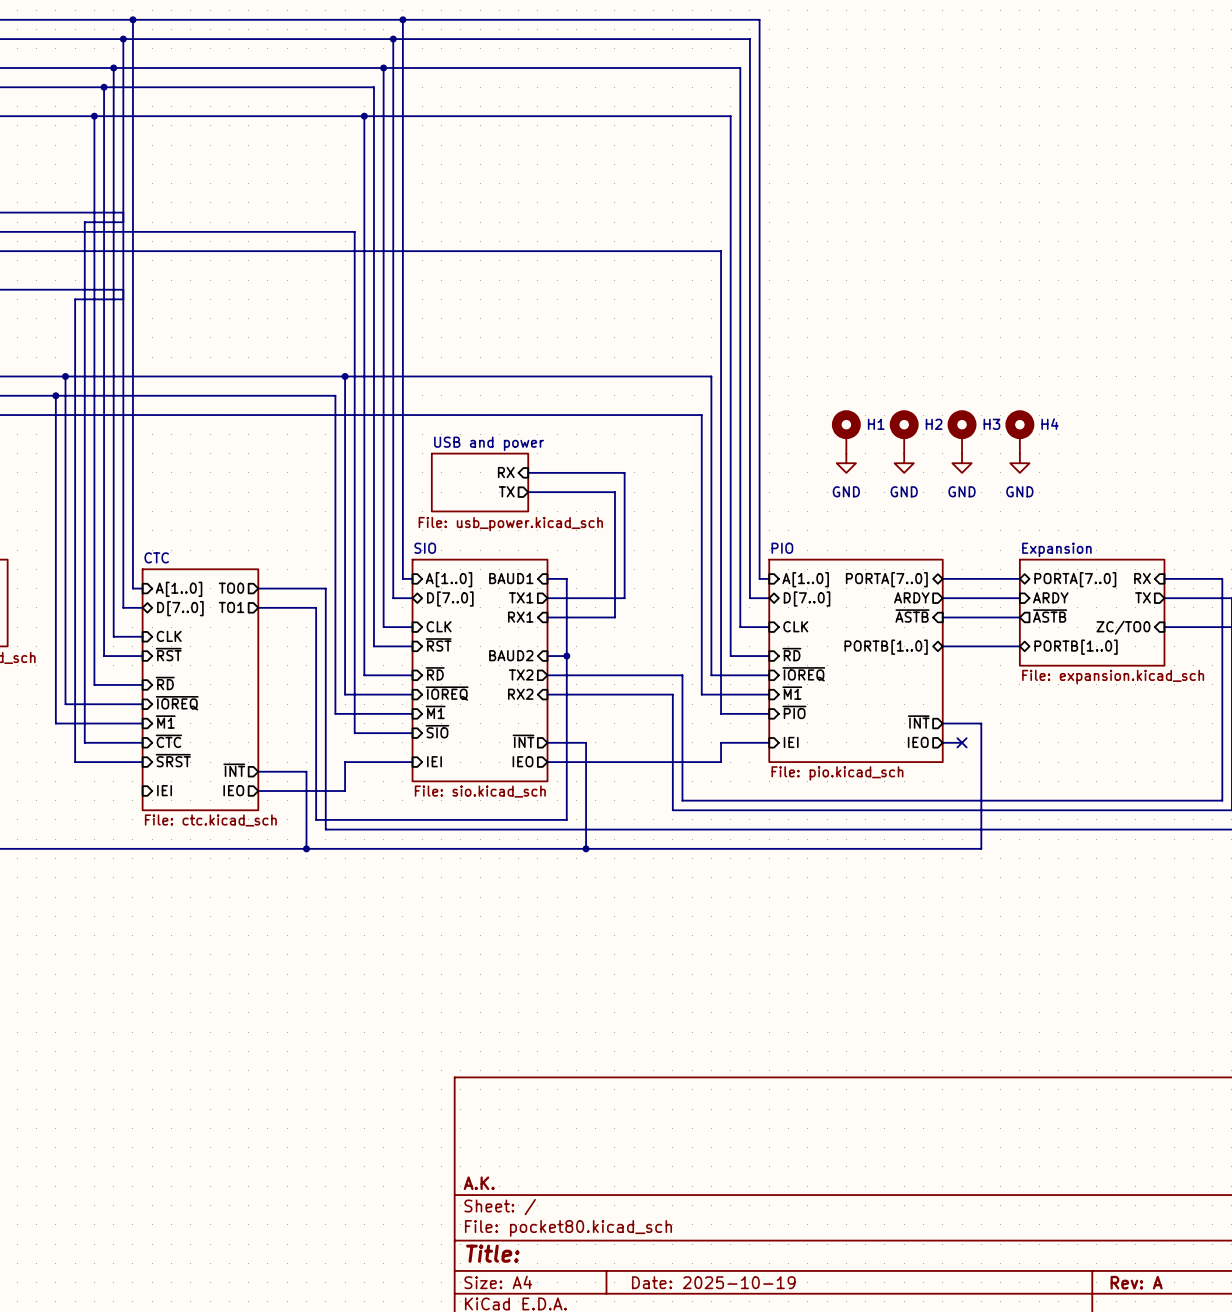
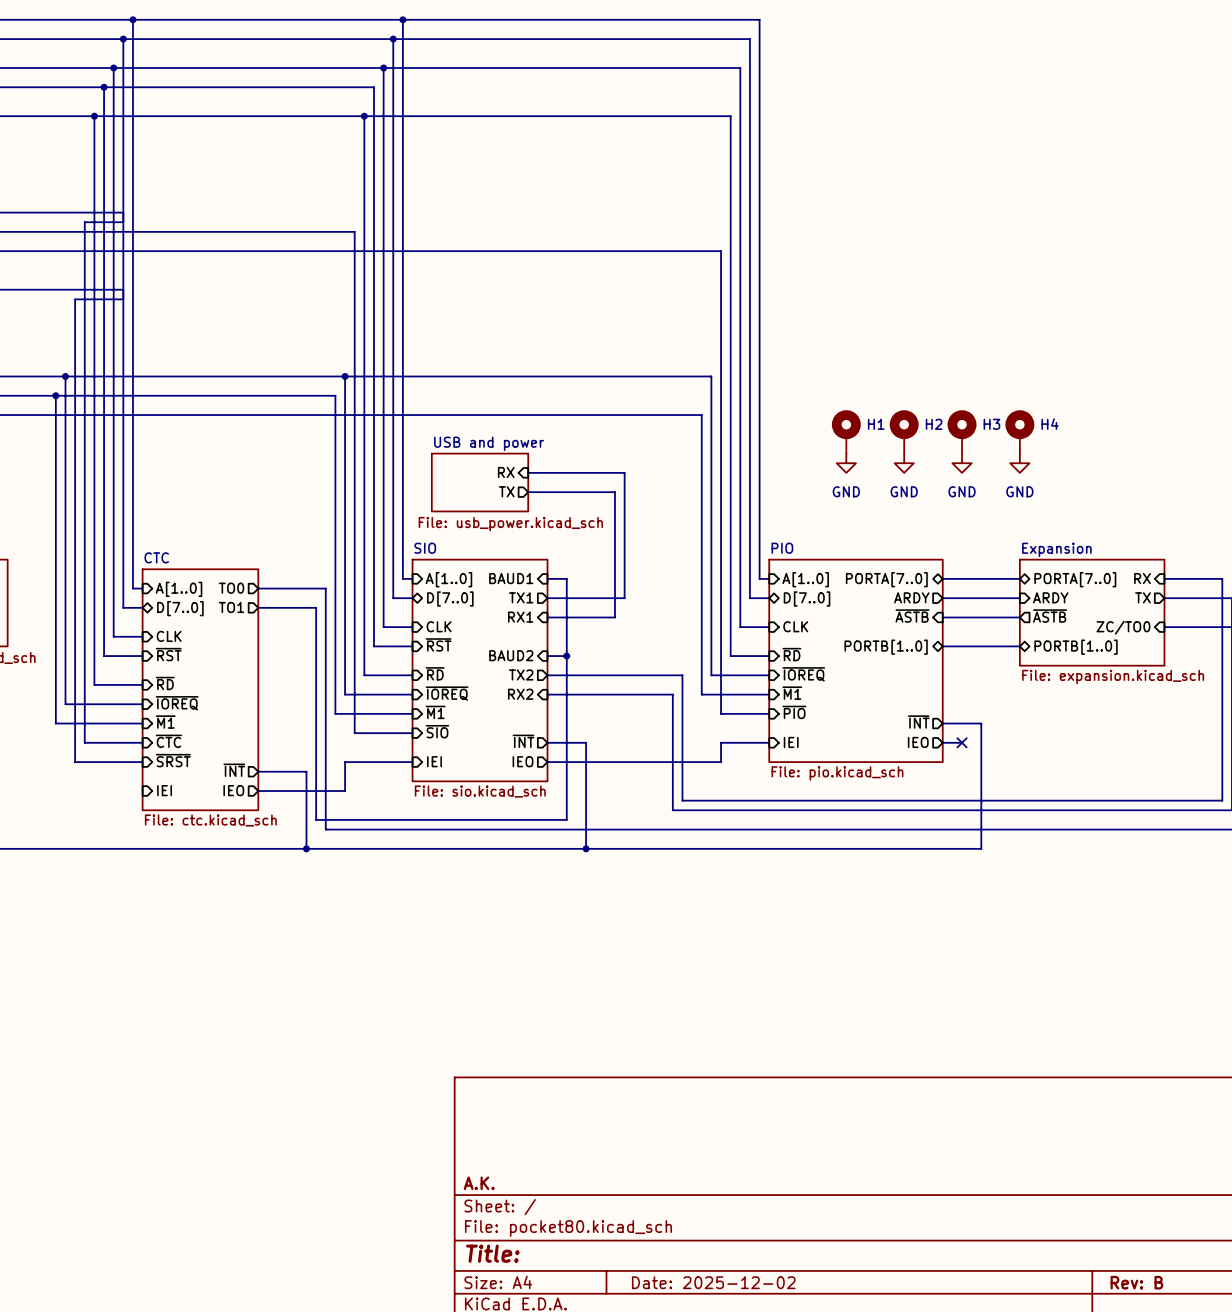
title block: Date: 2025-10-19 (713, 1282) -> Date: 2025-12-02 (713, 1282)
title block: Rev: A (1136, 1282) -> Rev: B (1136, 1282)

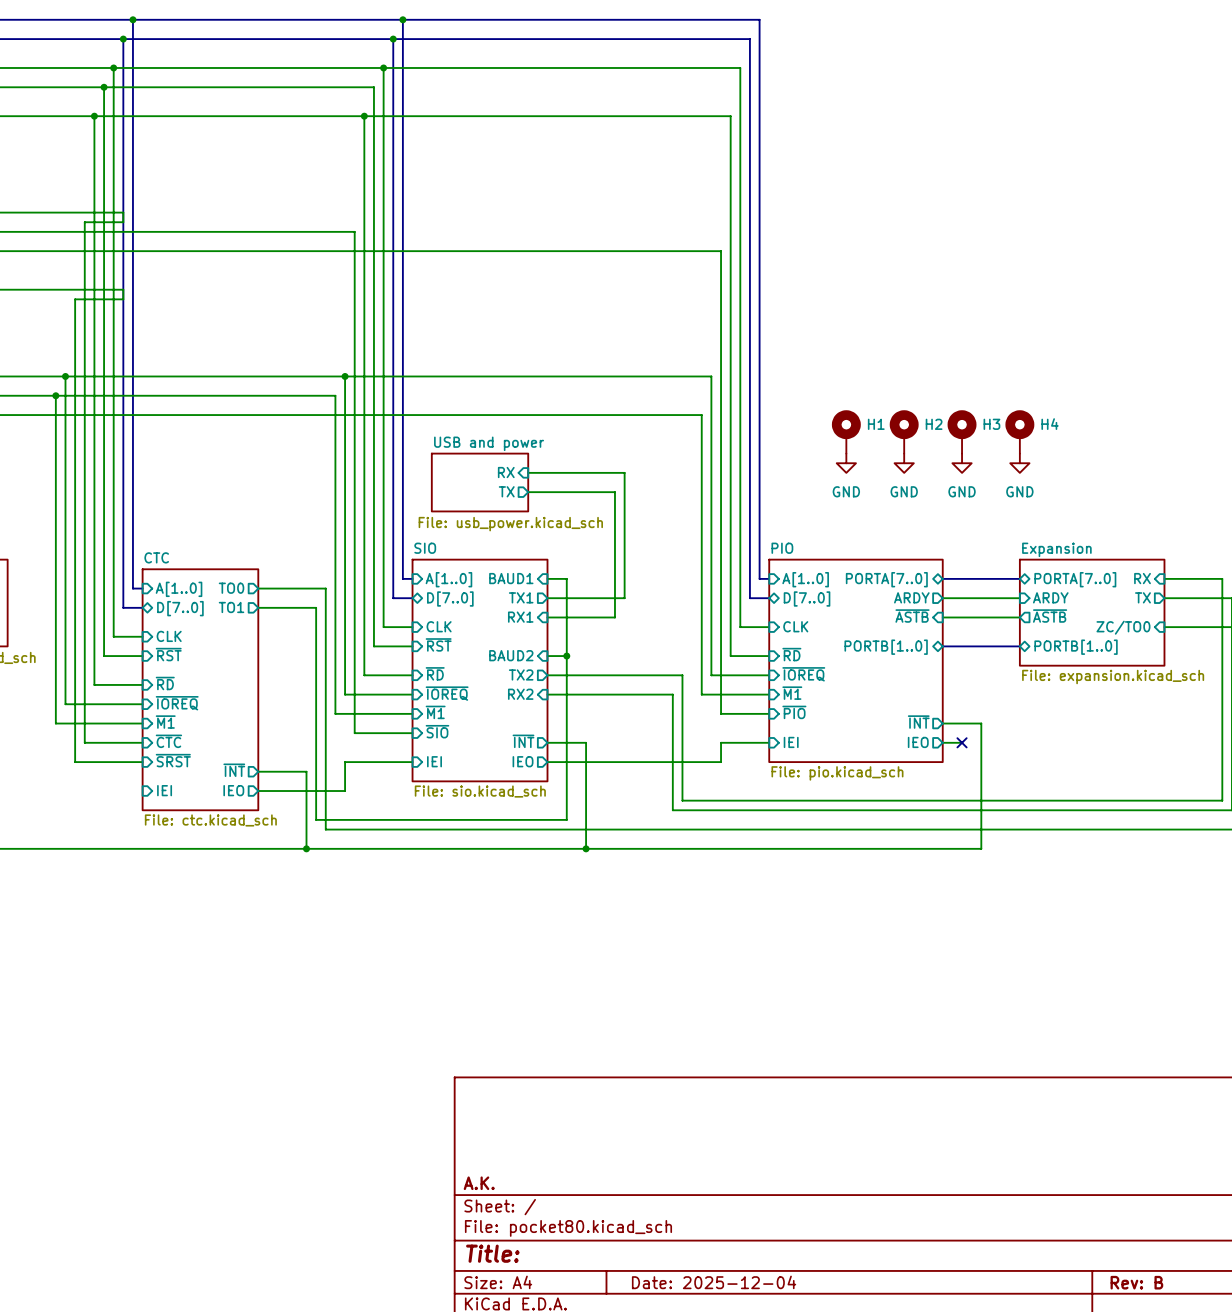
title block: Date: 2025-12-02 (713, 1282) -> Date: 2025-12-04 (714, 1282)

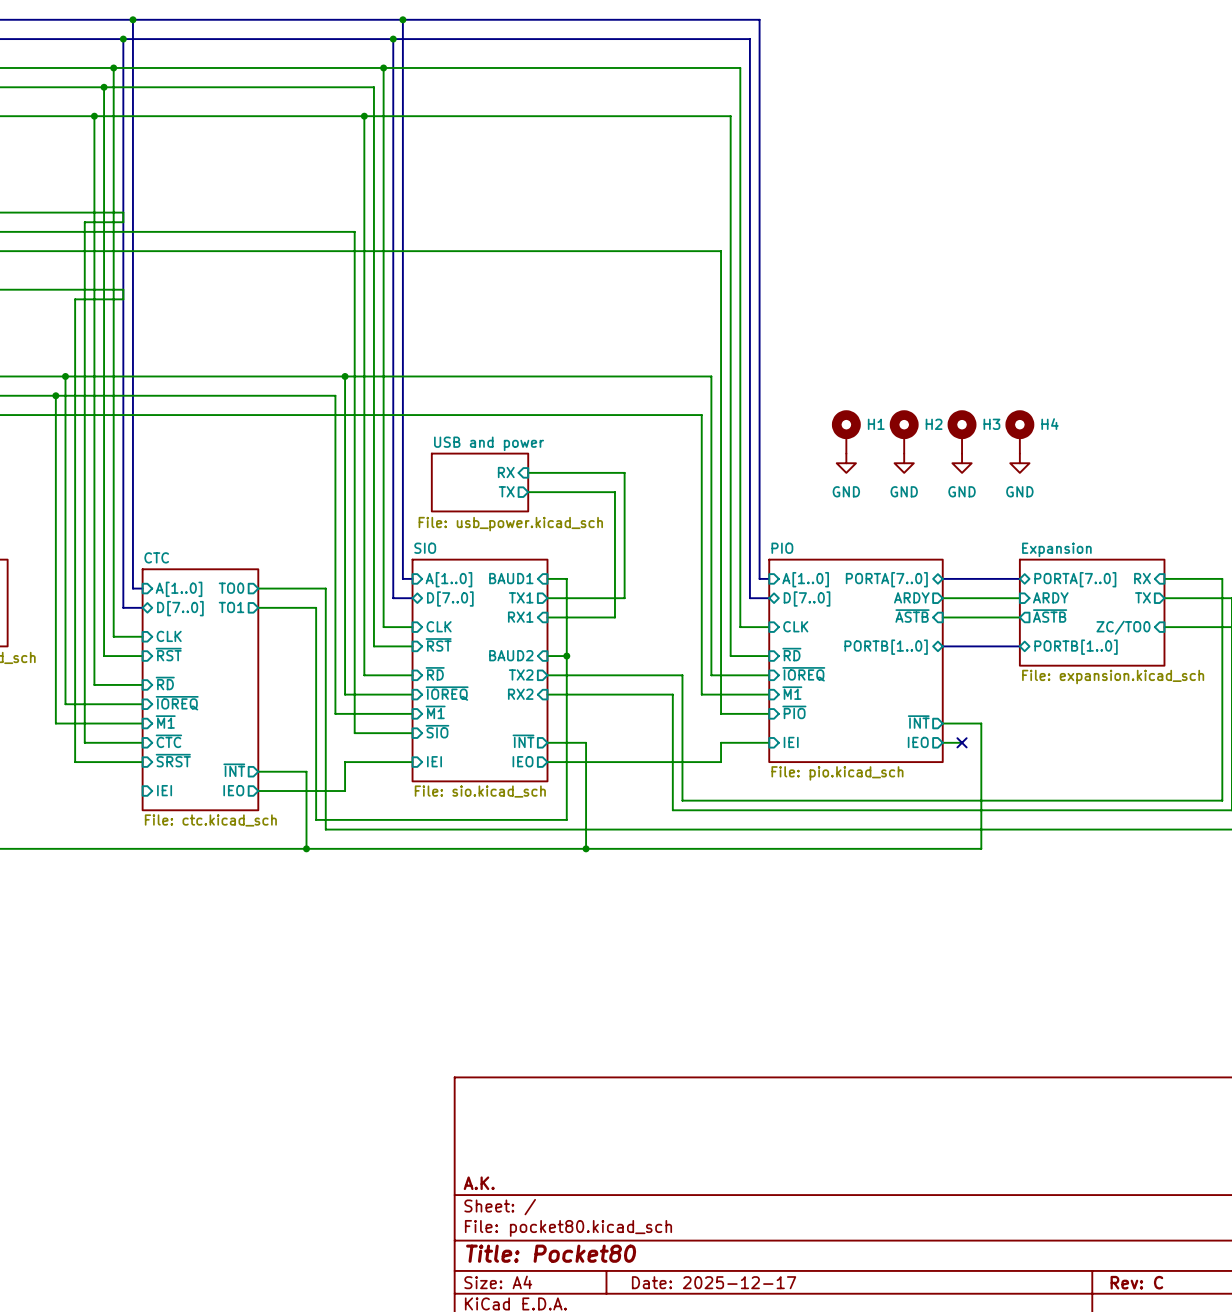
title block: Title: (492, 1253) -> Title: Pocket80 (551, 1253)
title block: Date: 2025-12-04 (714, 1282) -> Date: 2025-12-17 (714, 1282)
title block: Rev: B (1136, 1282) -> Rev: C (1136, 1282)

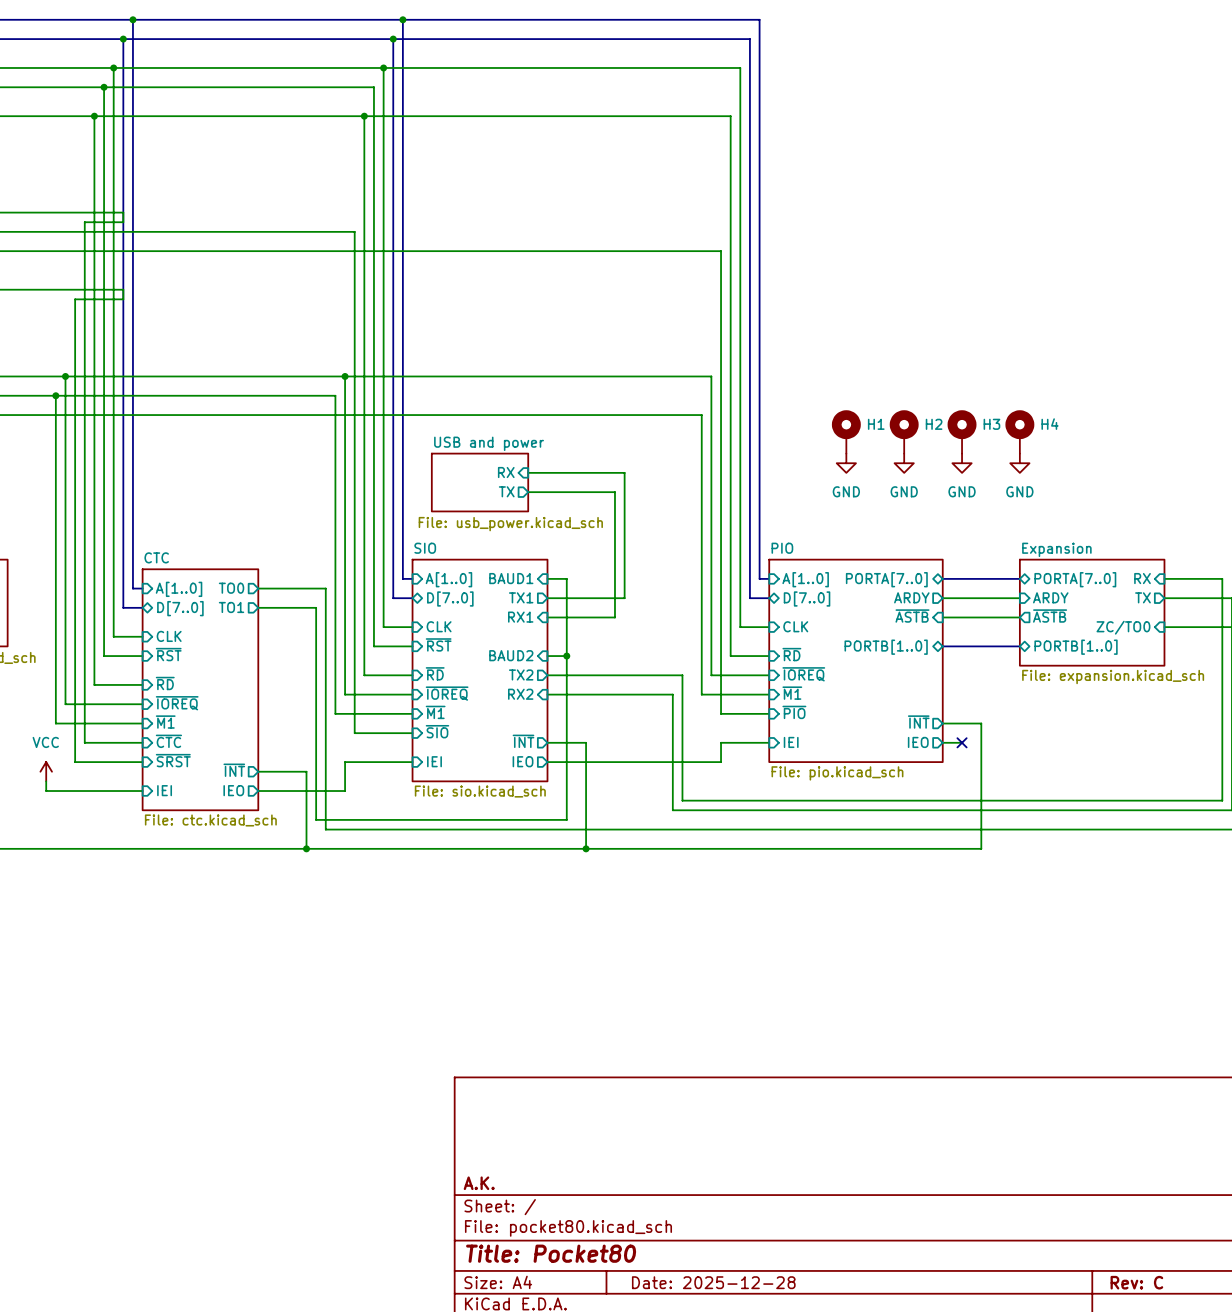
power symbol: none -> VCC (46, 771)
wire: none -> (46, 781) (46, 791) (142, 791)
title block: Date: 2025-12-17 (714, 1282) -> Date: 2025-12-28 (713, 1282)

